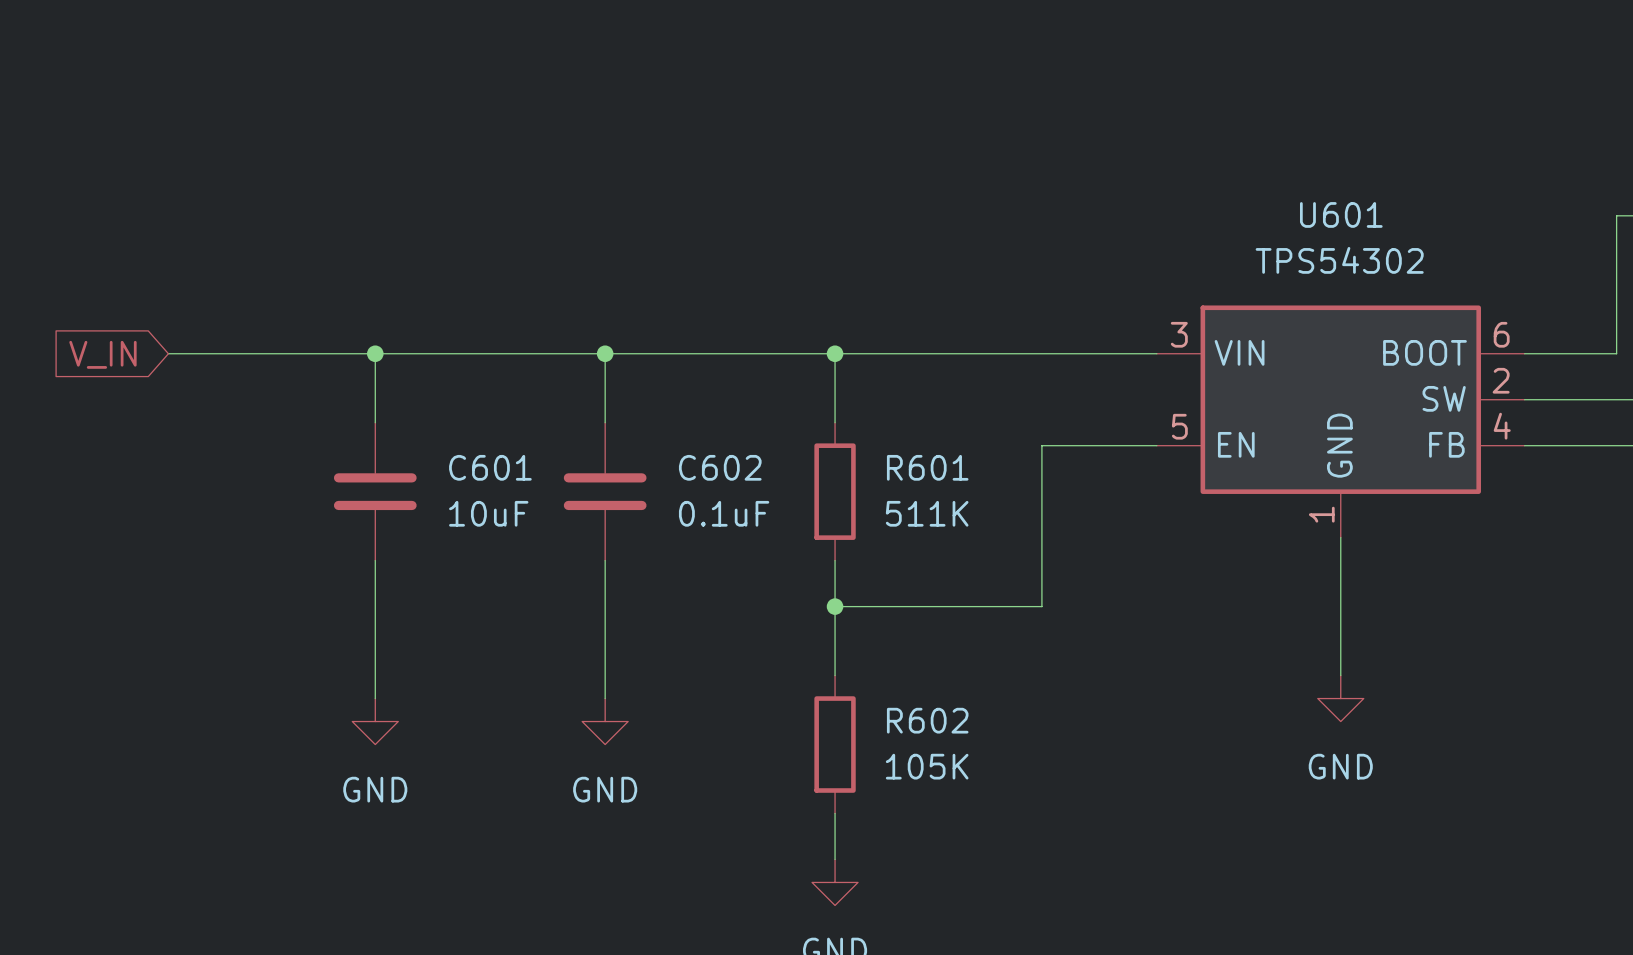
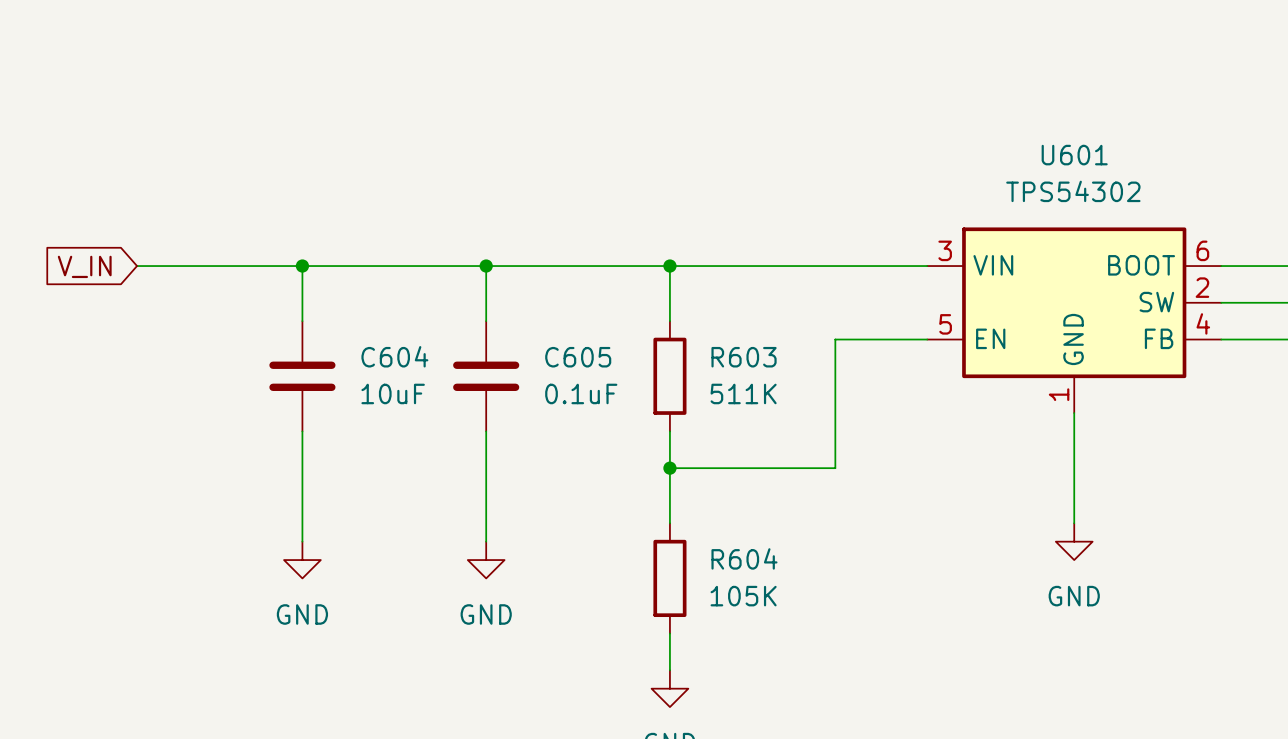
C601 name: C601 (490, 467) -> C604 (394, 356)
C602 name: C602 (720, 467) -> C605 (578, 357)
R601 name: R601 (927, 467) -> R603 (744, 357)
R602 name: R602 (927, 720) -> R604 (744, 558)

